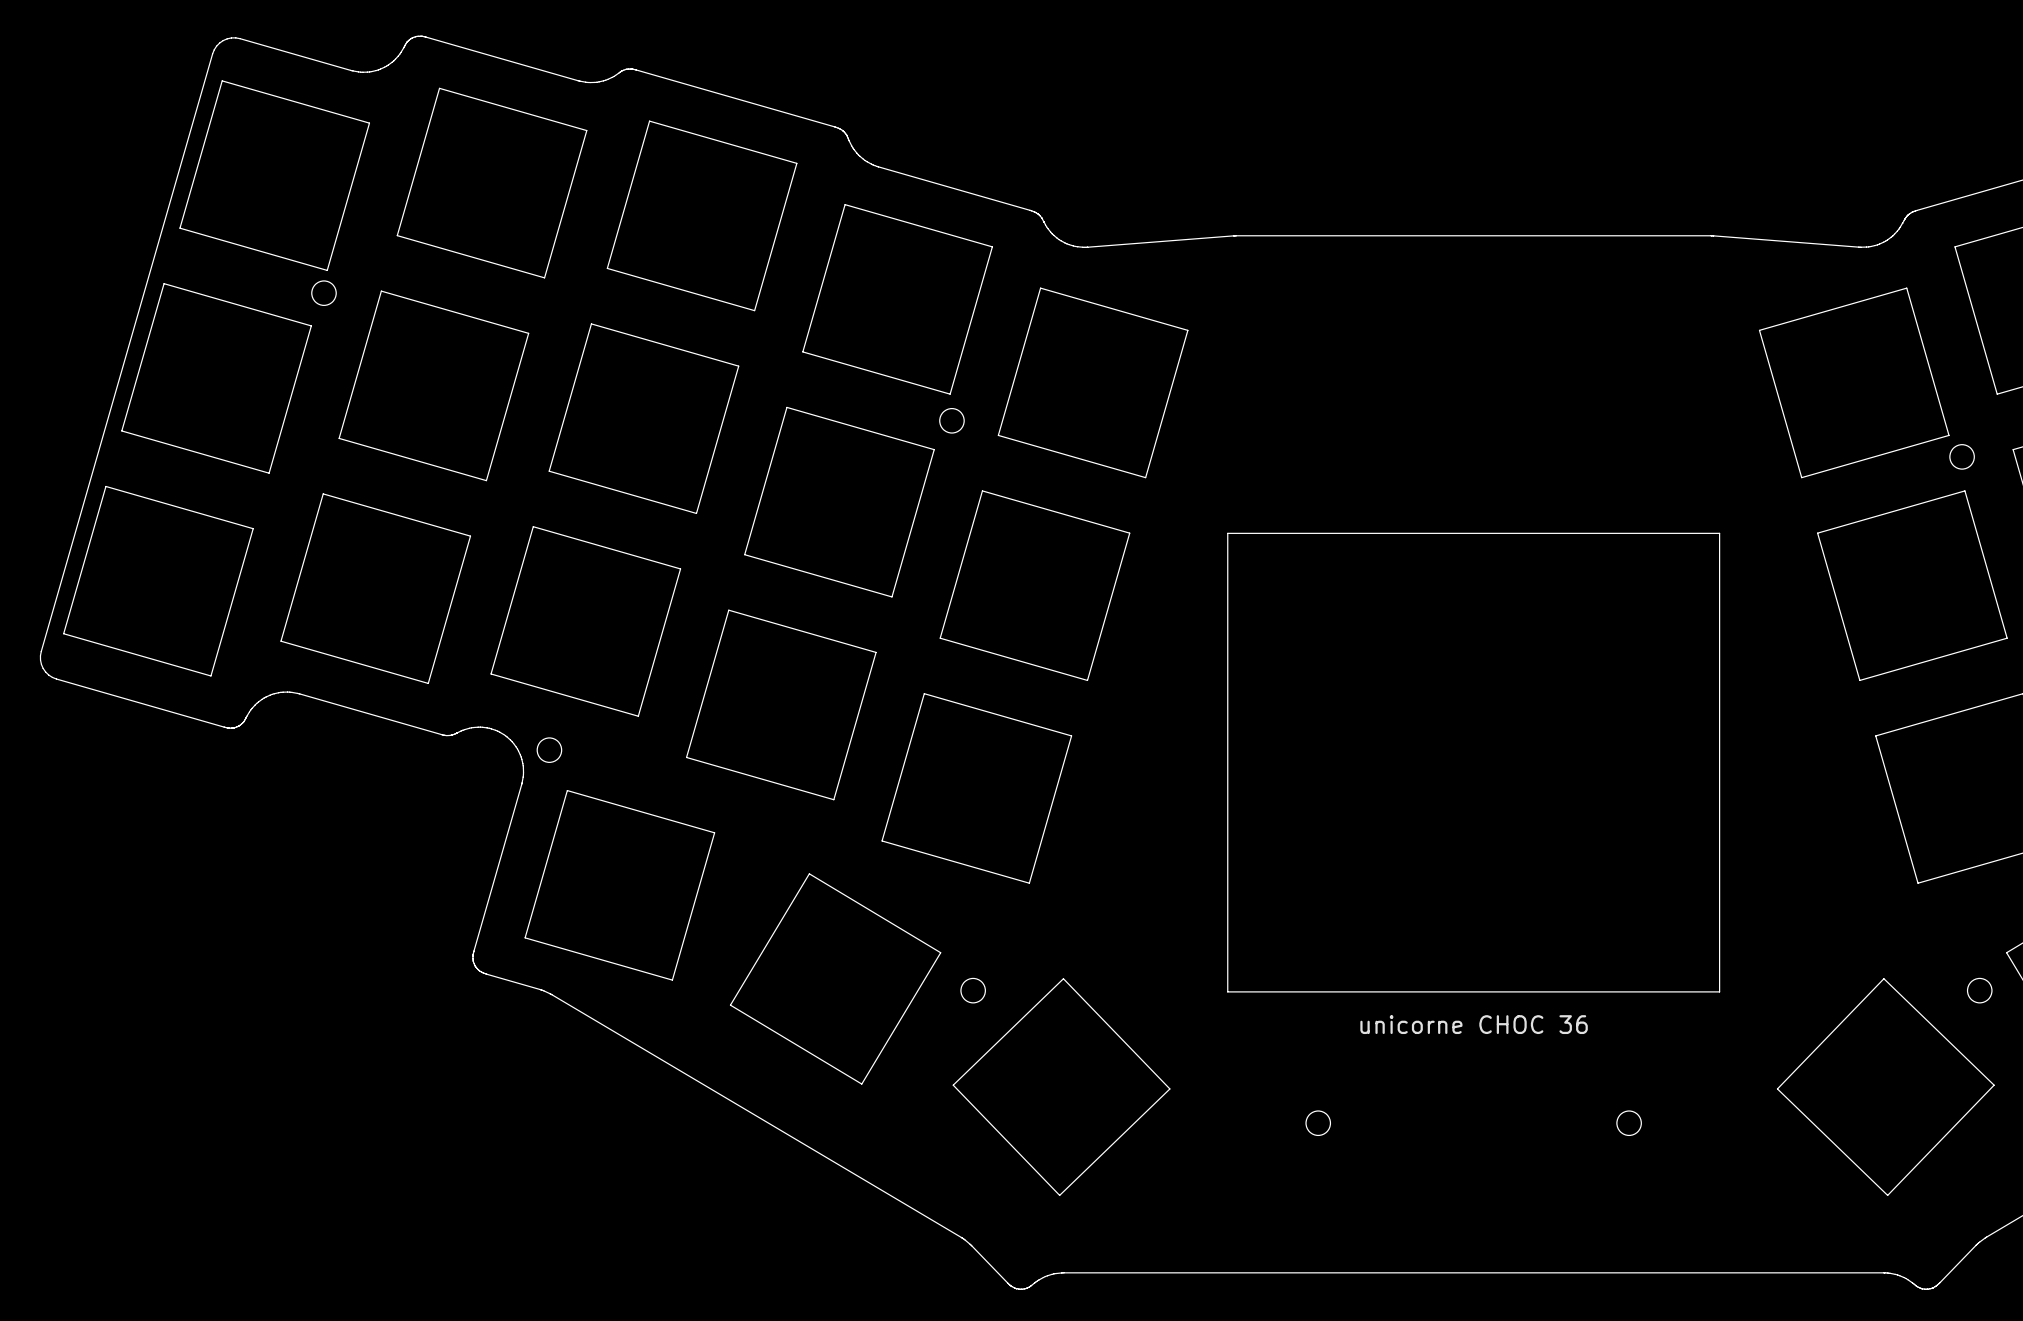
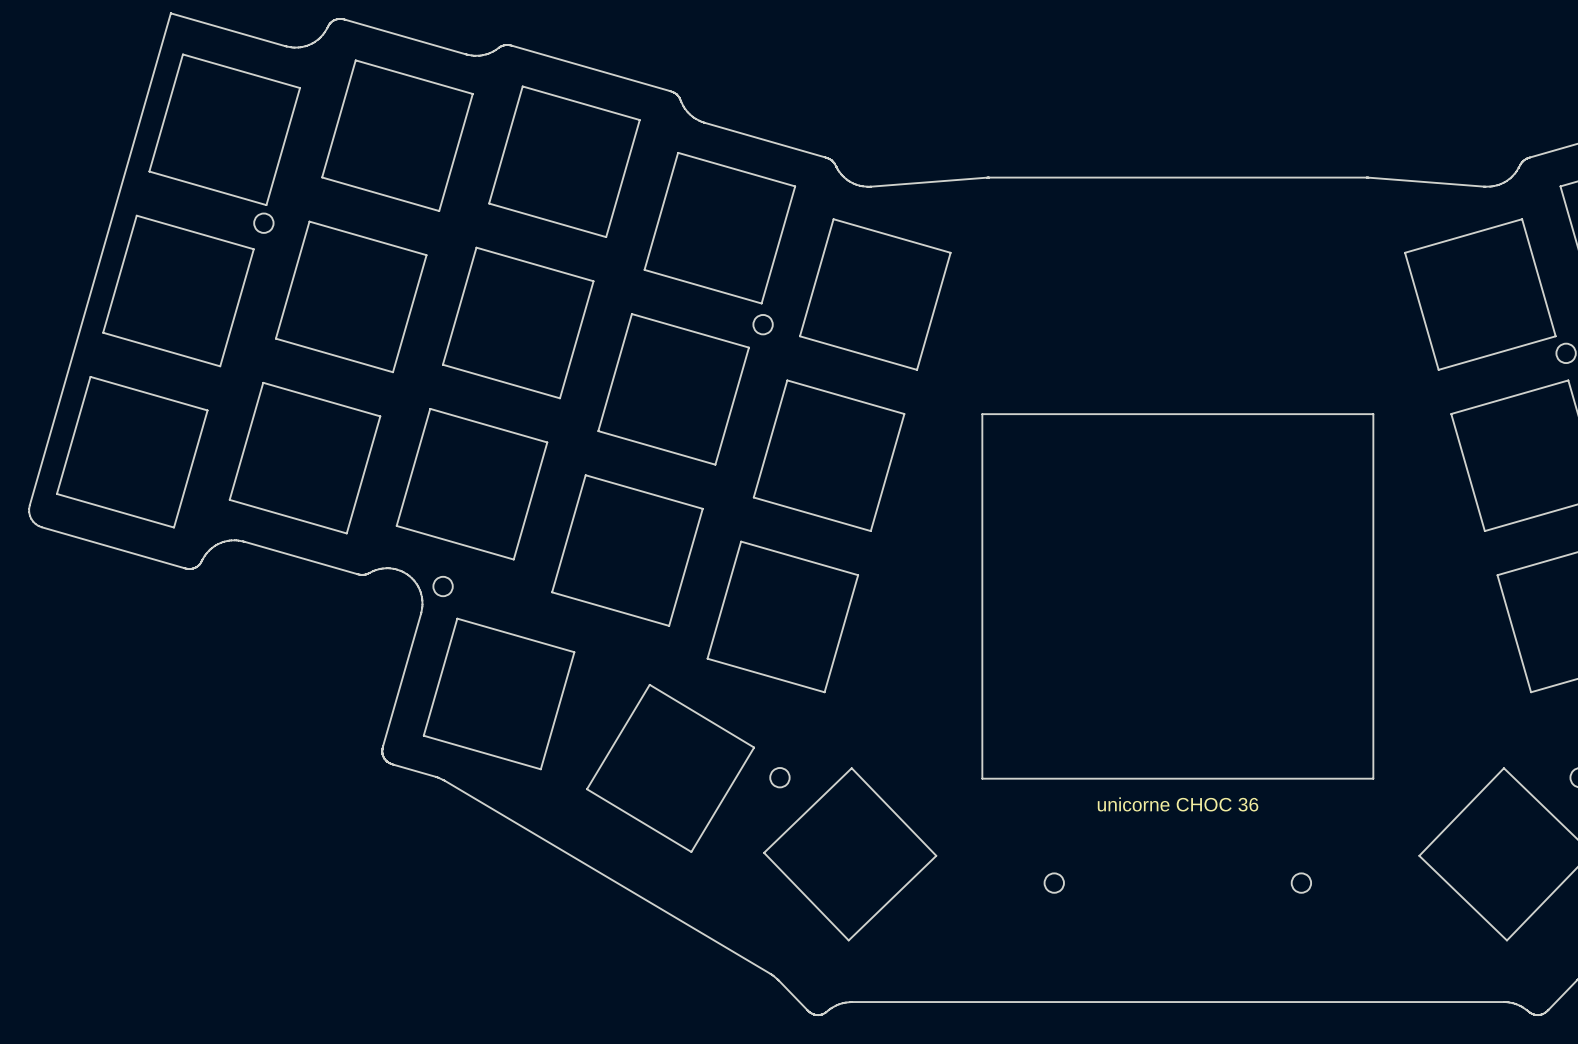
board edge: (240, 38) (231, 37) (223, 40) (216, 46) (212, 53) (41, 651) (40, 660) (43, 668) (48, 675) (56, 679) -> (197, 20) (170, 13) (29, 505) (29, 512) (33, 521) (38, 526) (51, 529)

